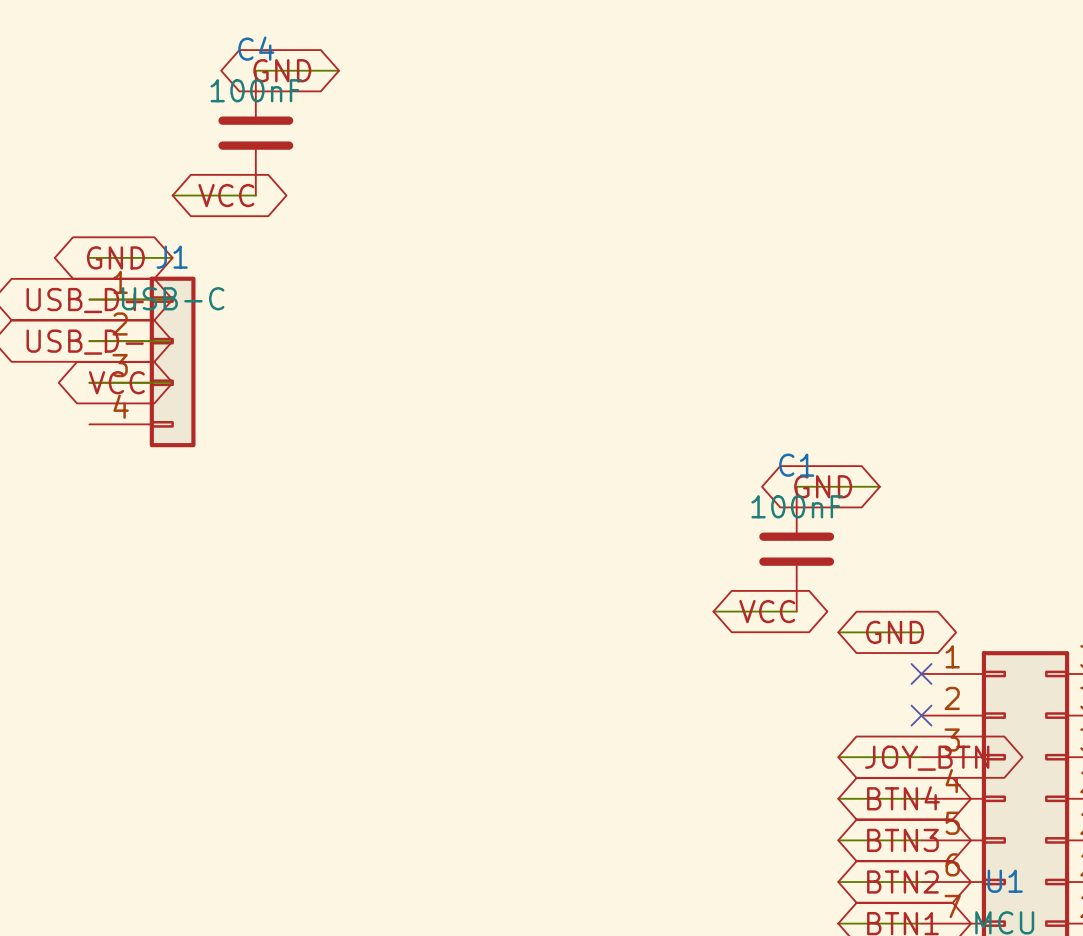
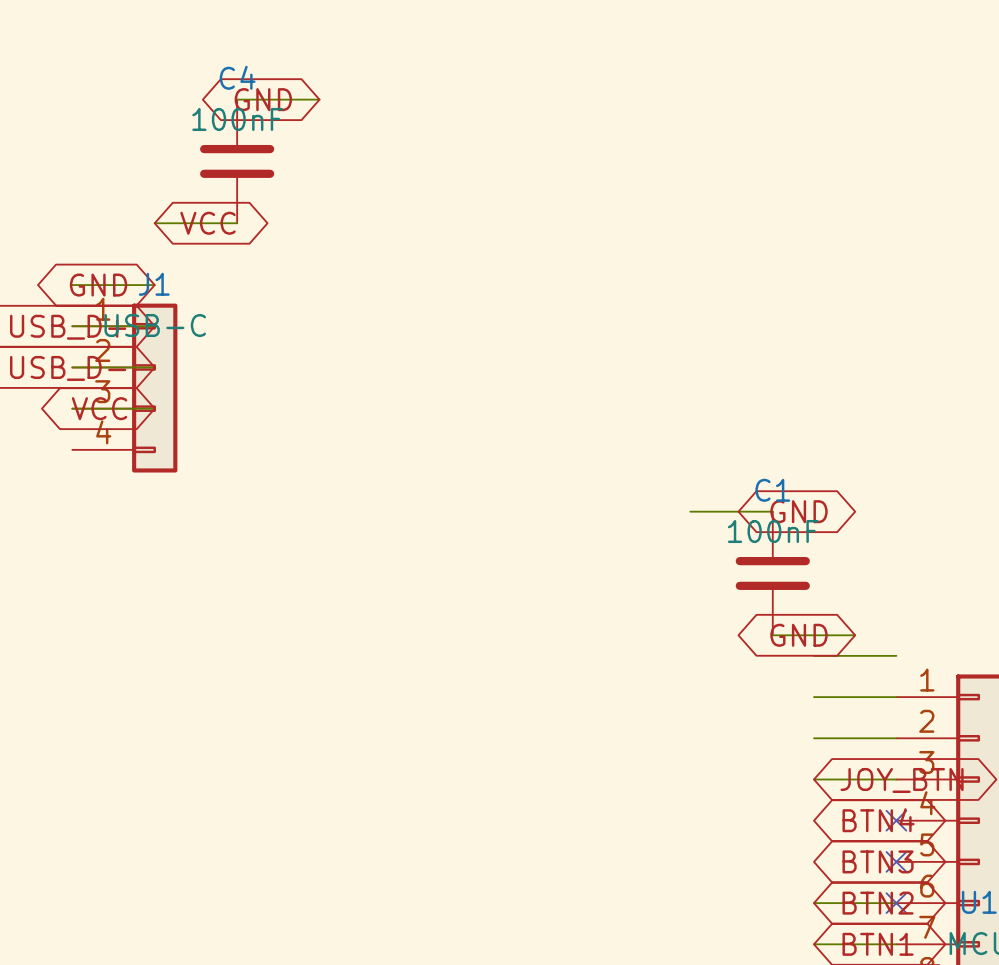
wire: (796, 486) (879, 486) -> (772, 511) (690, 511)
wire: (713, 611) (796, 611) -> (855, 635) (772, 635)
global label: VCC (767, 611) -> none
global label rotation: 0° (895, 632) -> 180° (799, 635)
no-connect mark: (921, 673) -> none
no-connect mark: (921, 715) -> none
wire: (838, 798) (921, 798) -> (813, 697) (896, 697)
no-connect mark: none -> (896, 820)
wire: (838, 840) (921, 840) -> (813, 738) (896, 738)
no-connect mark: none -> (896, 861)
no-connect mark: none -> (896, 903)

